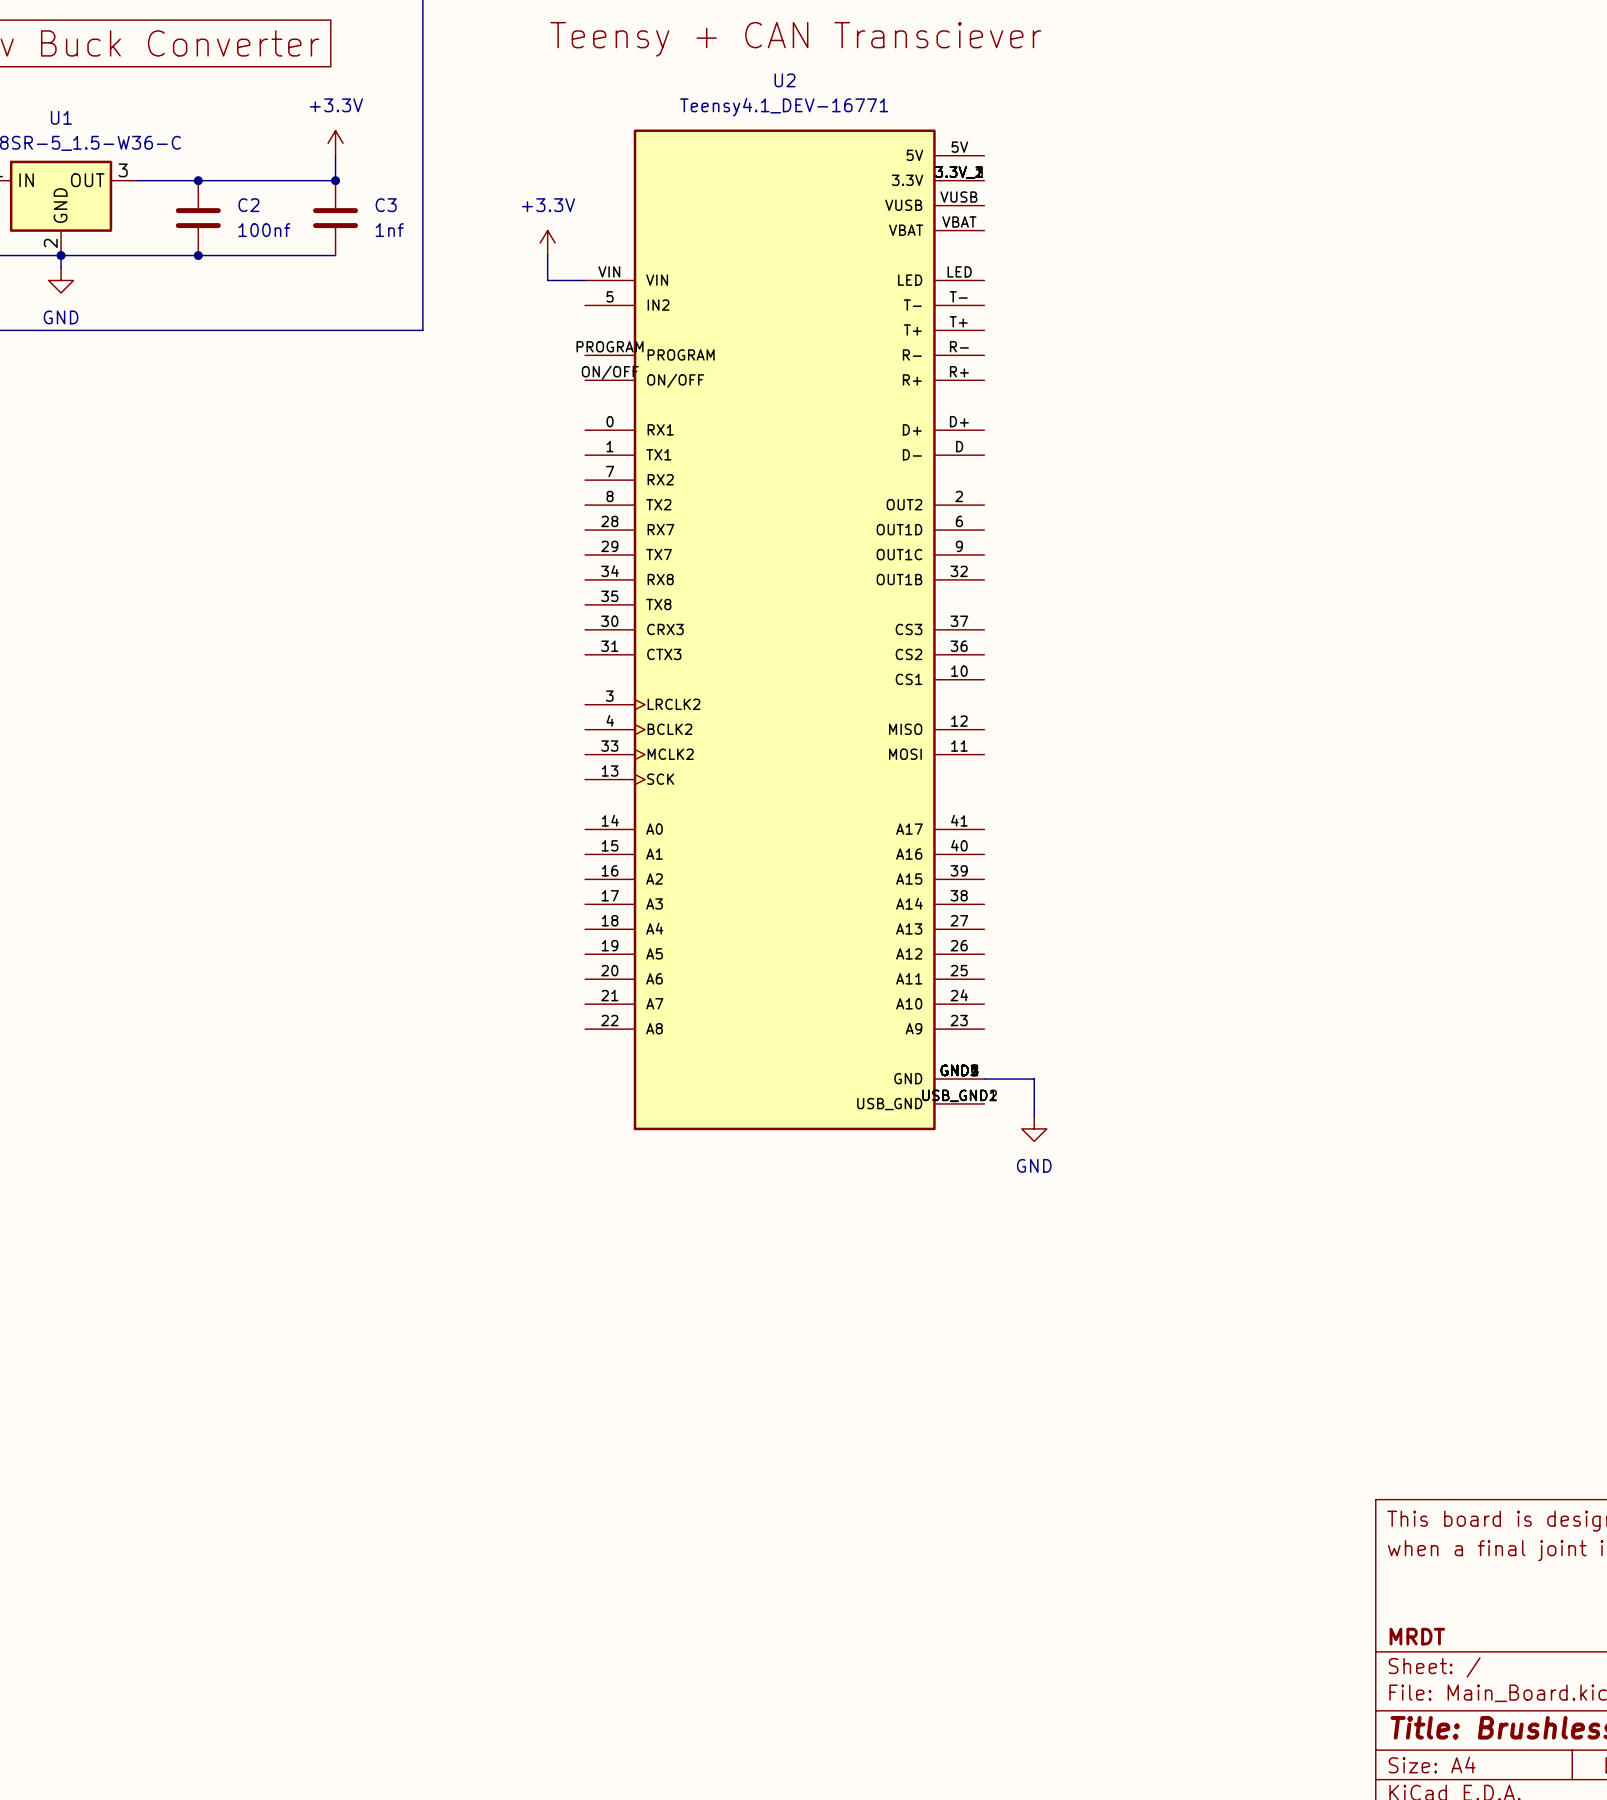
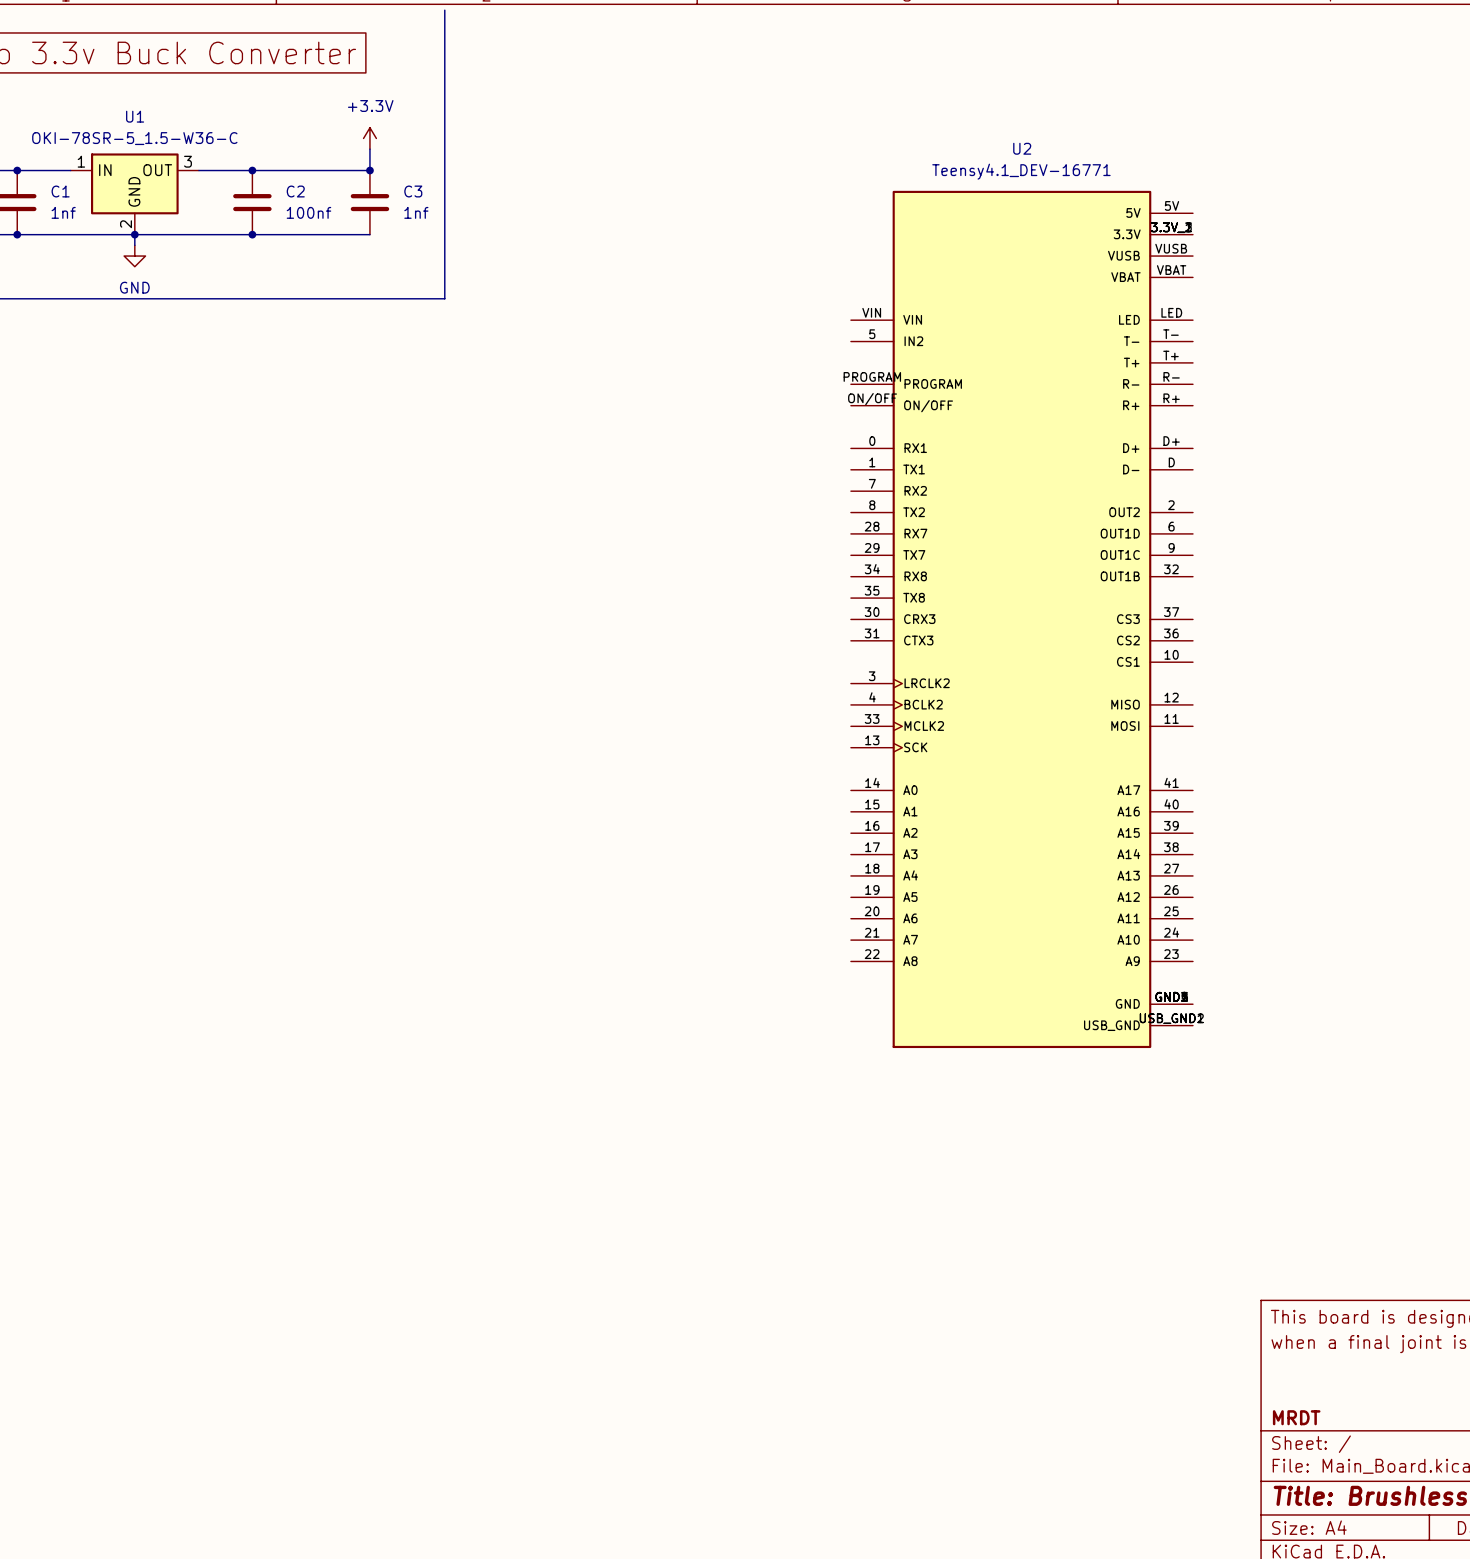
label: Teensy + CAN Transciever (795, 39) -> none
power symbol: +3.3V (547, 243) -> none
wire: (547, 255) (547, 280) (585, 280) -> none
U2 position: (784, 629) -> (1021, 619)
power symbol: GND (1034, 1128) -> none

